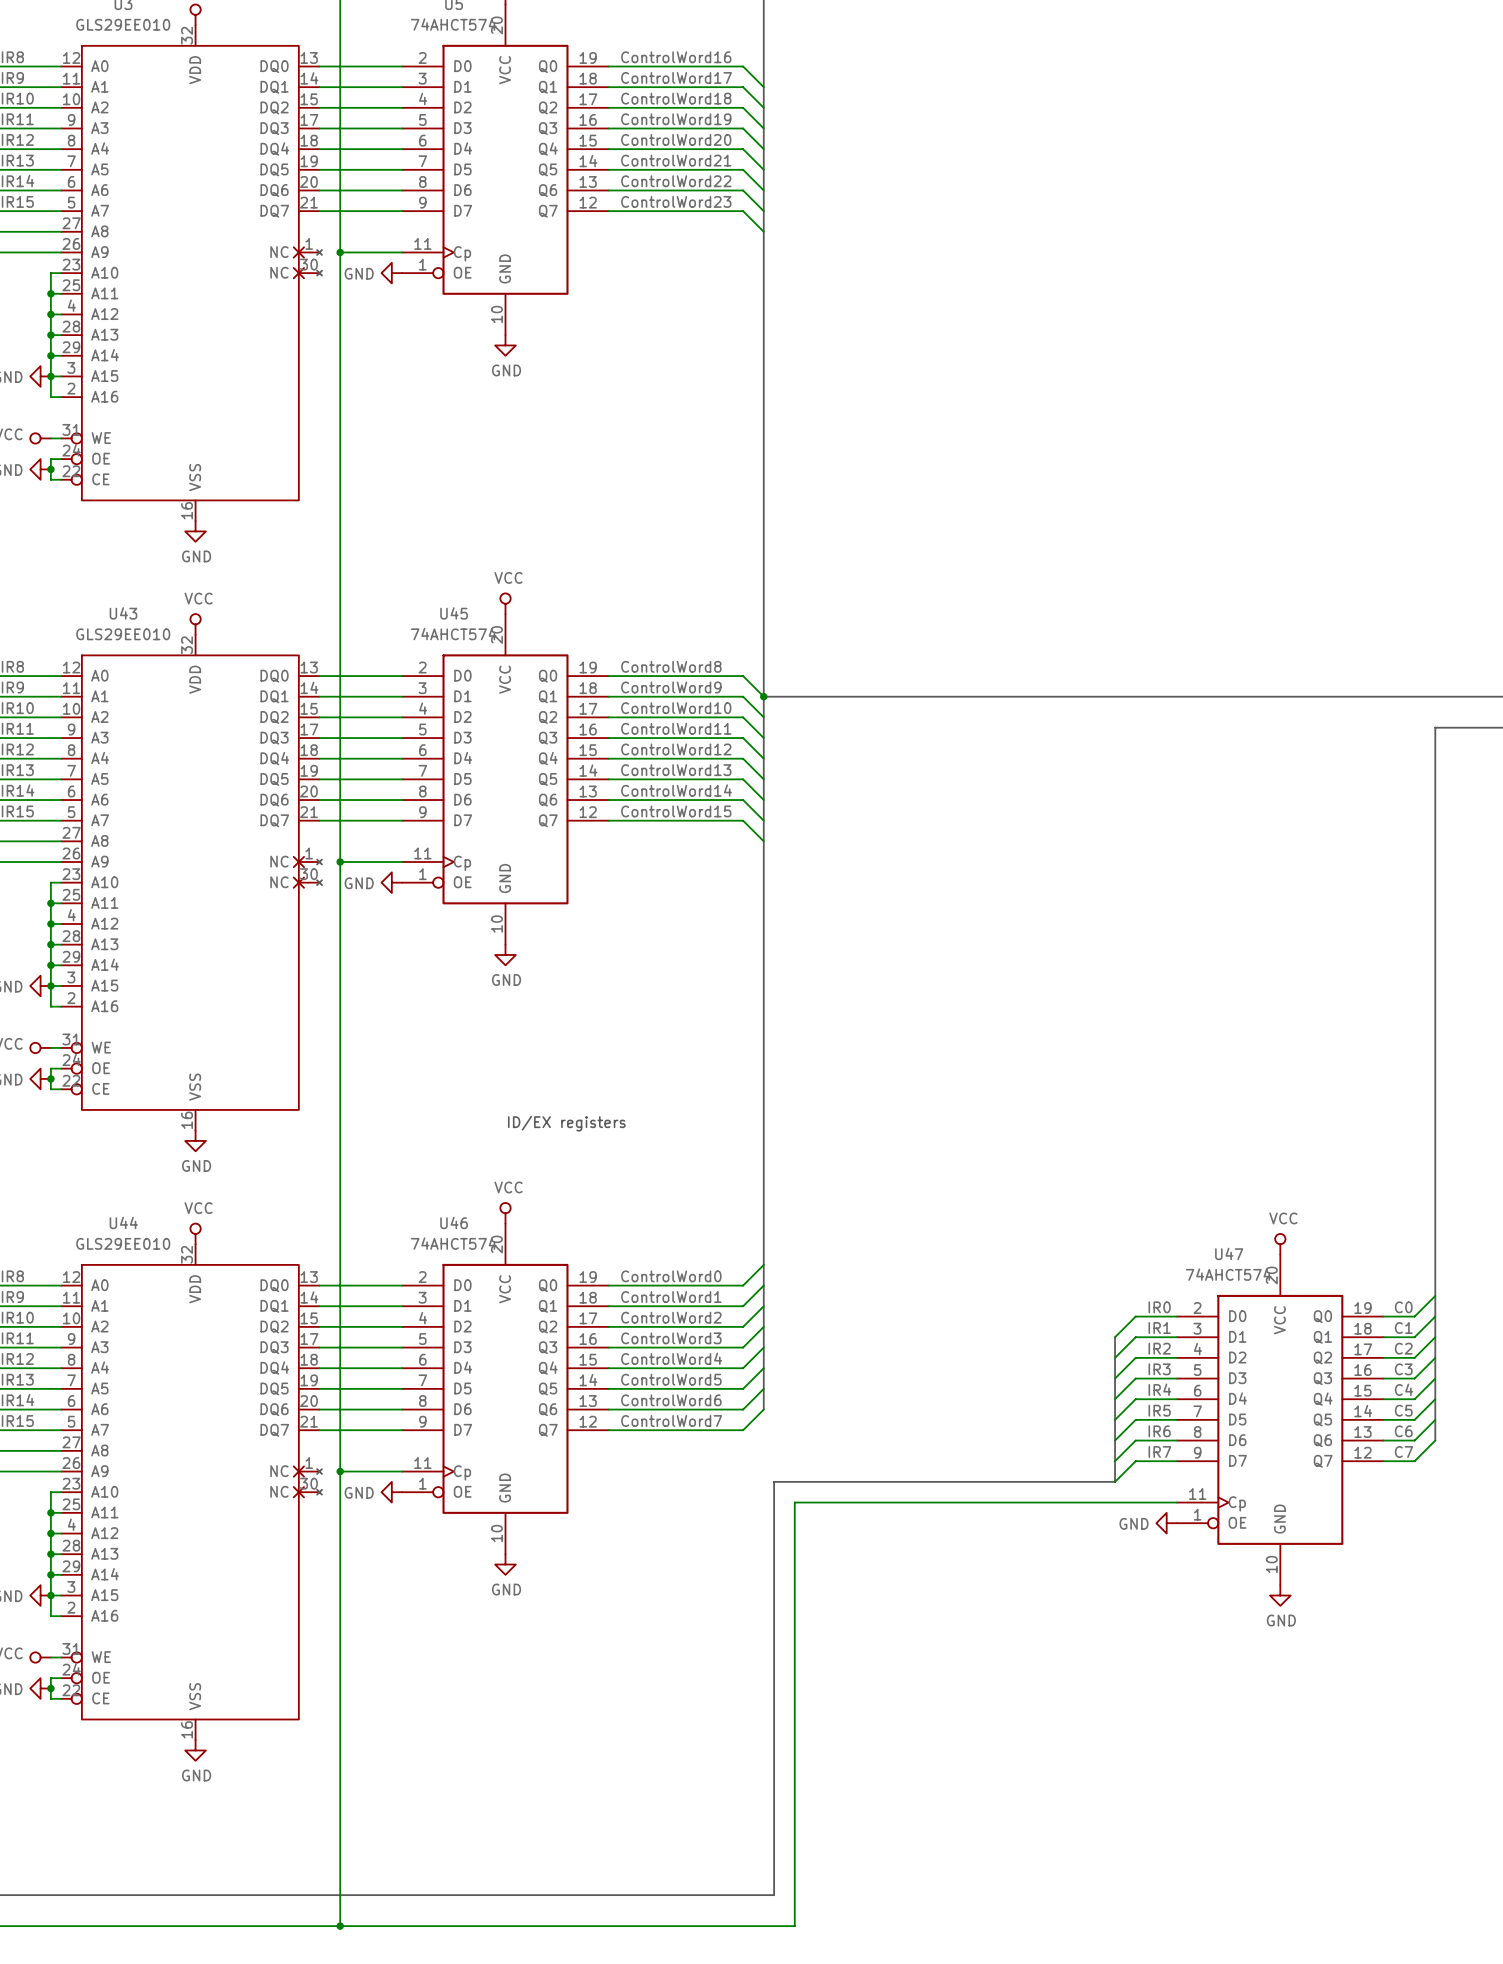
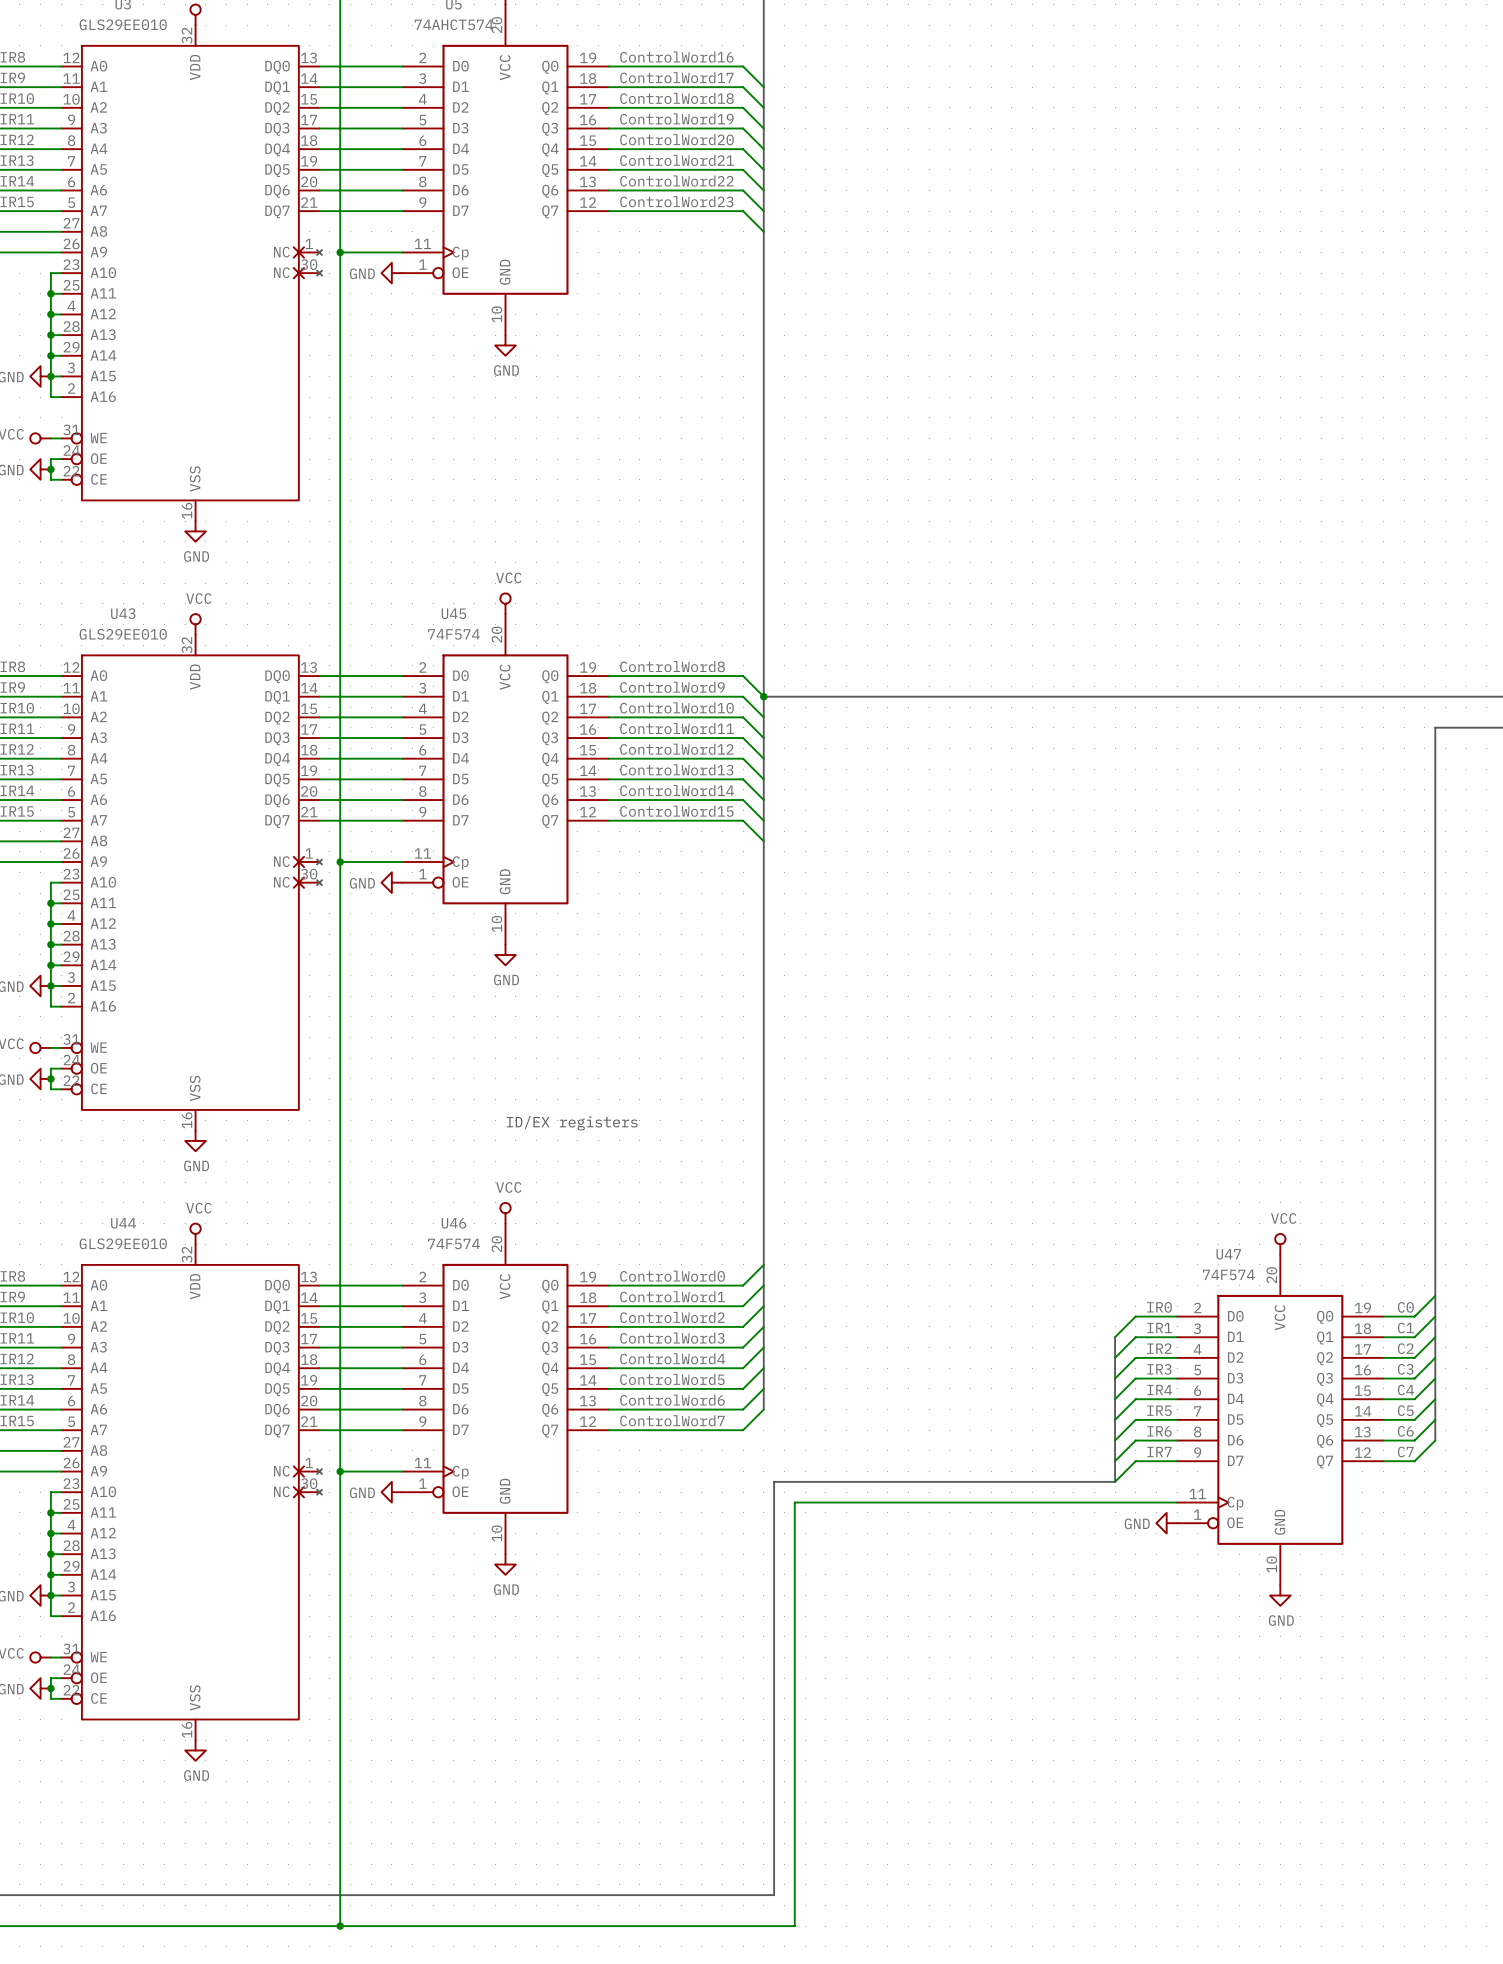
U45 value: 74AHCT574 (453, 634) -> 74F574 (454, 634)
U46 value: 74AHCT574 (453, 1243) -> 74F574 (454, 1243)
U47 value: 74AHCT574 (1228, 1274) -> 74F574 (1228, 1274)

